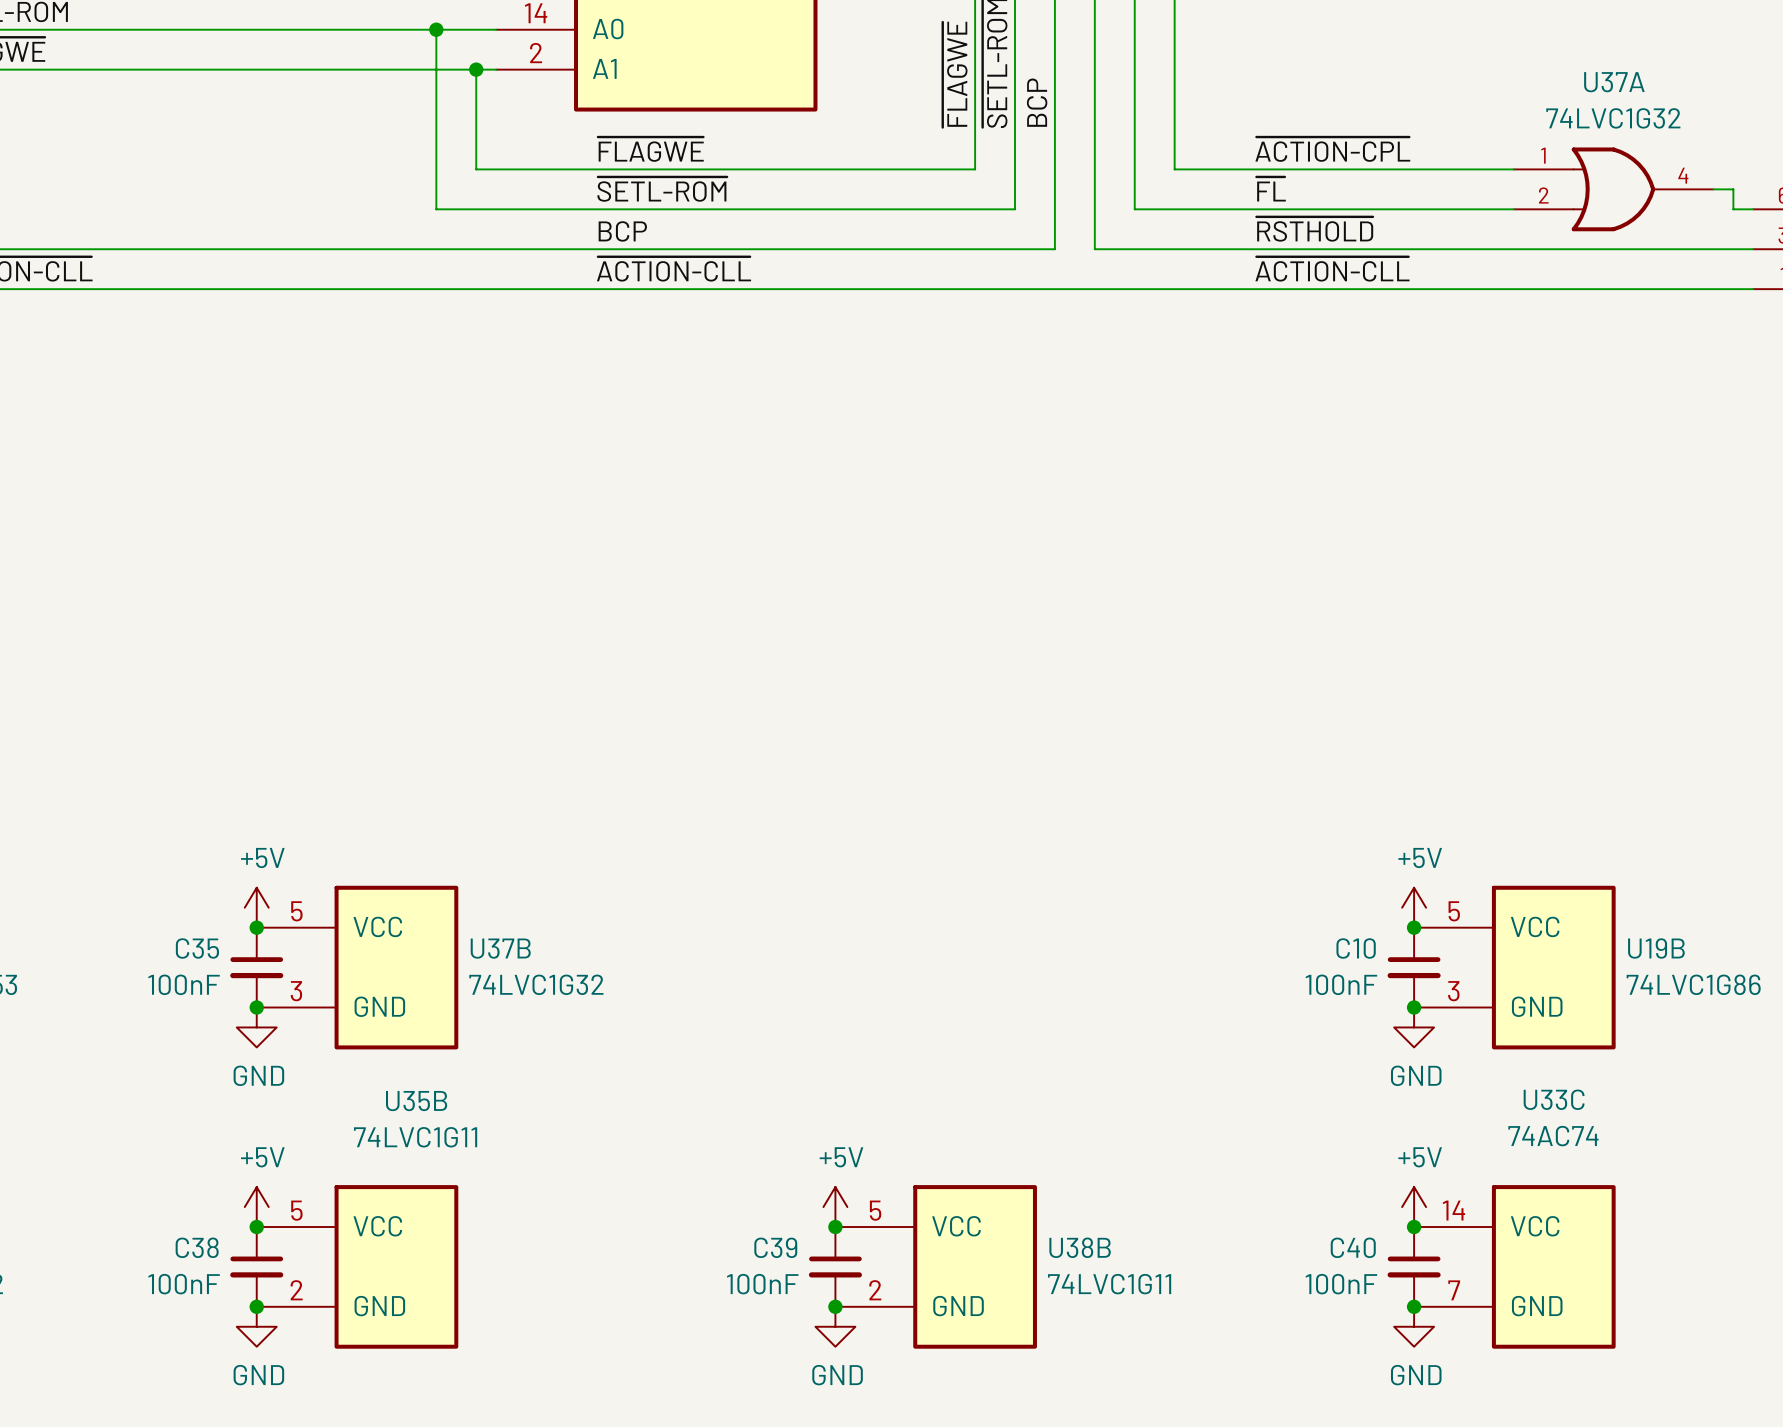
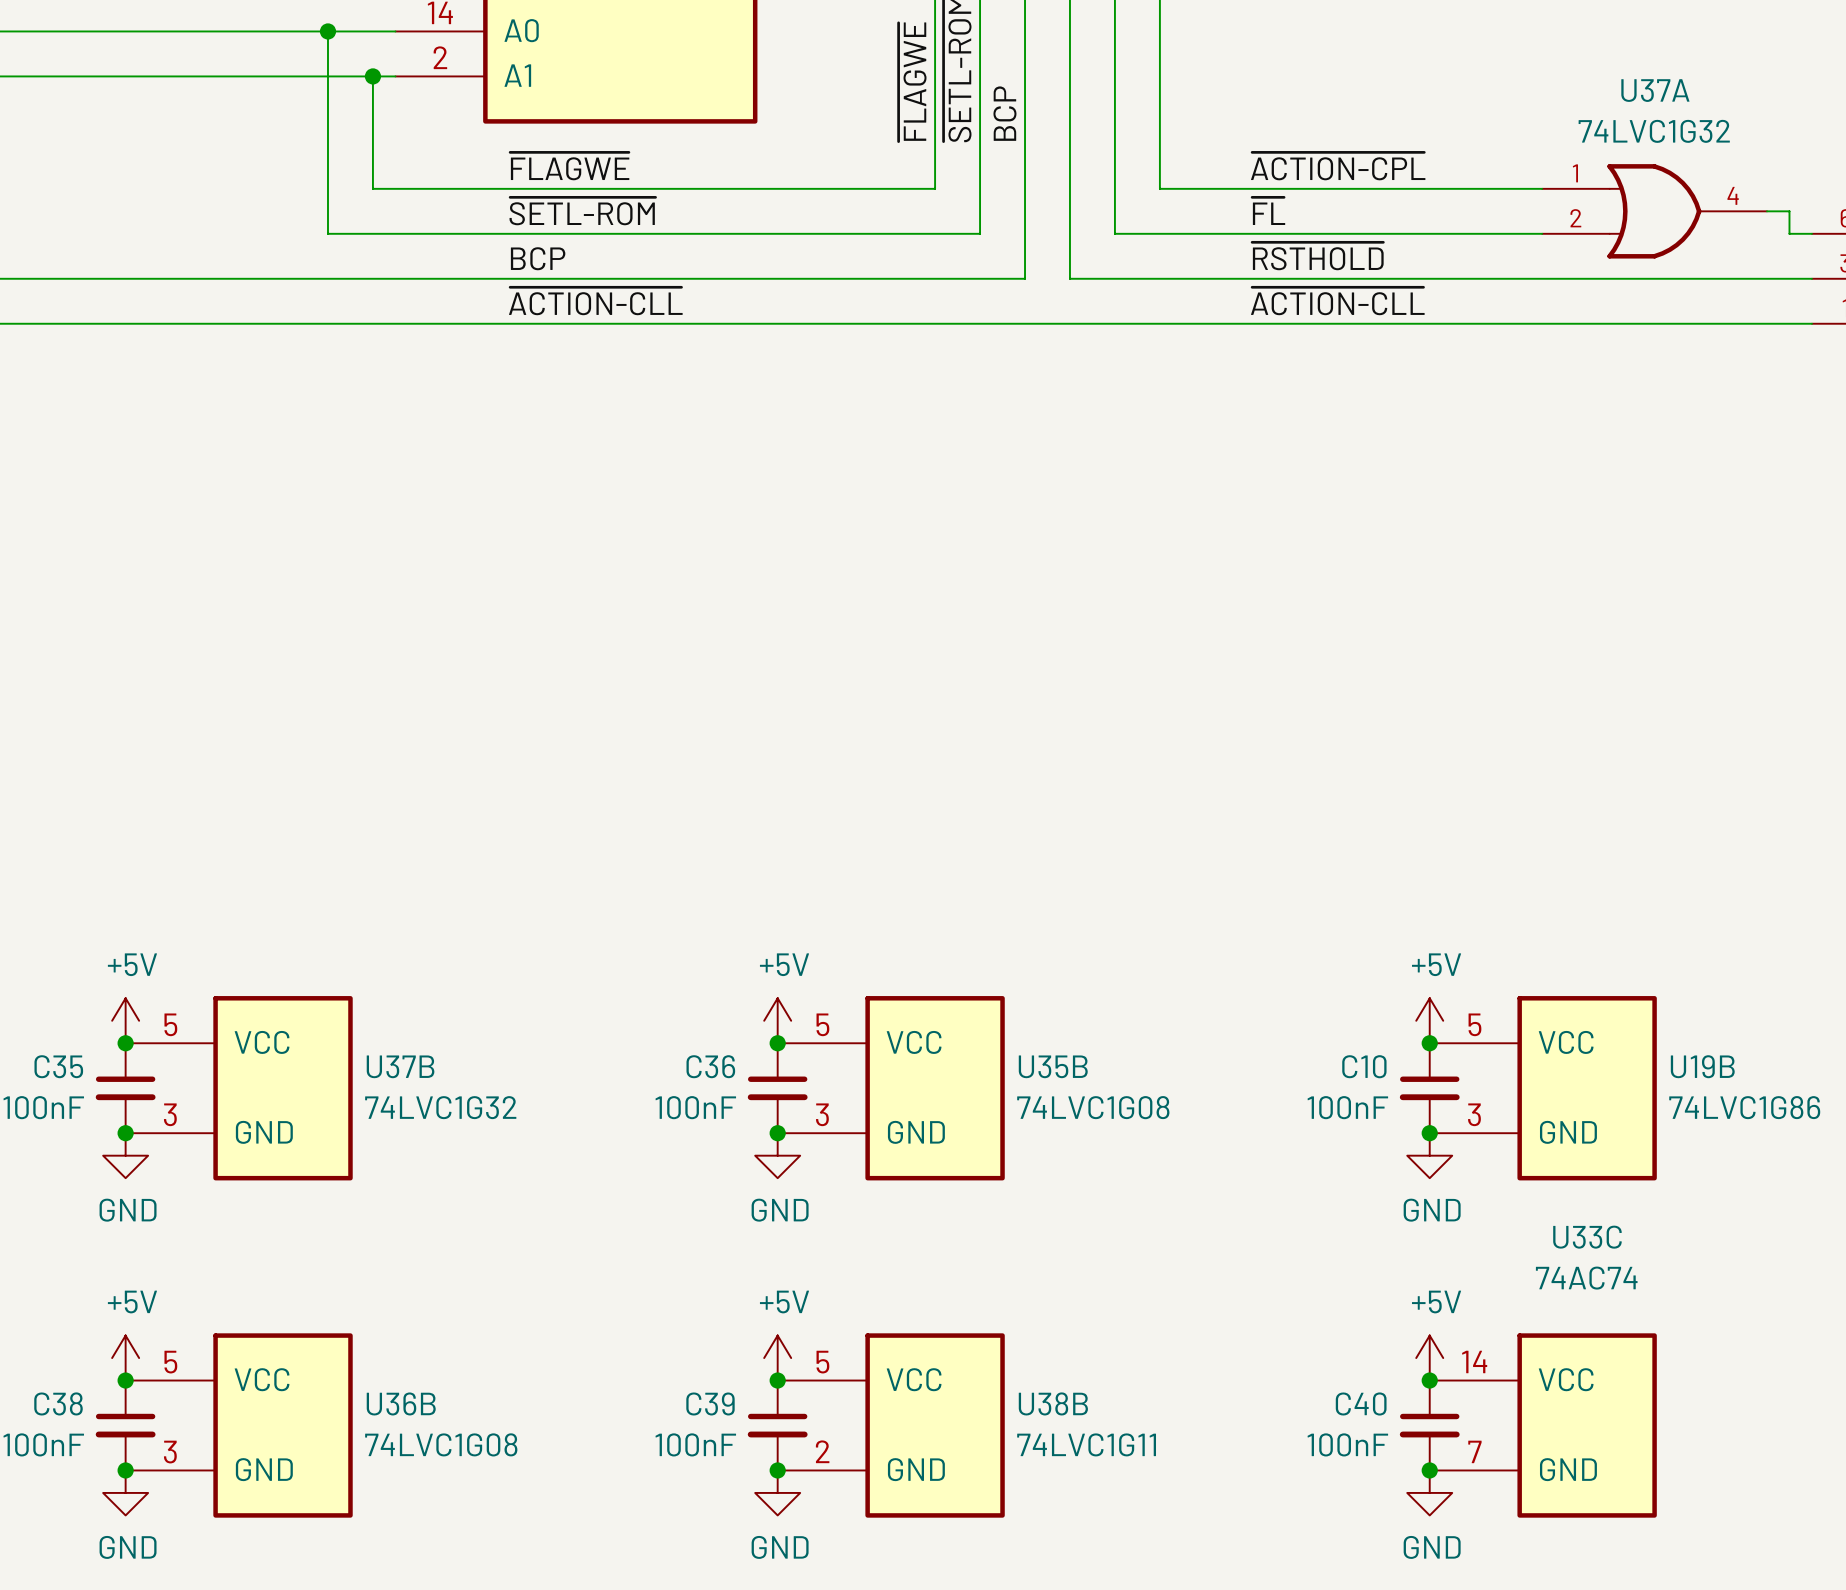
power symbol: none -> +5V (777, 1020)
junction: none -> (777, 1043)
C36: none -> 100nF (777, 1088)
junction: none -> (777, 1133)
power symbol: none -> GND (777, 1155)
U35B name position: U35B (416, 1101) -> U35B (1053, 1066)
U35B value: 74LVC1G11 (415, 1137) -> 74LVC1G08 (1093, 1107)
U35B position: (357, 1266) -> (891, 1088)
U36B: none -> 74LVC1G08 (239, 1425)
U35B pin number: 2 (296, 1290) -> 3 (822, 1114)

